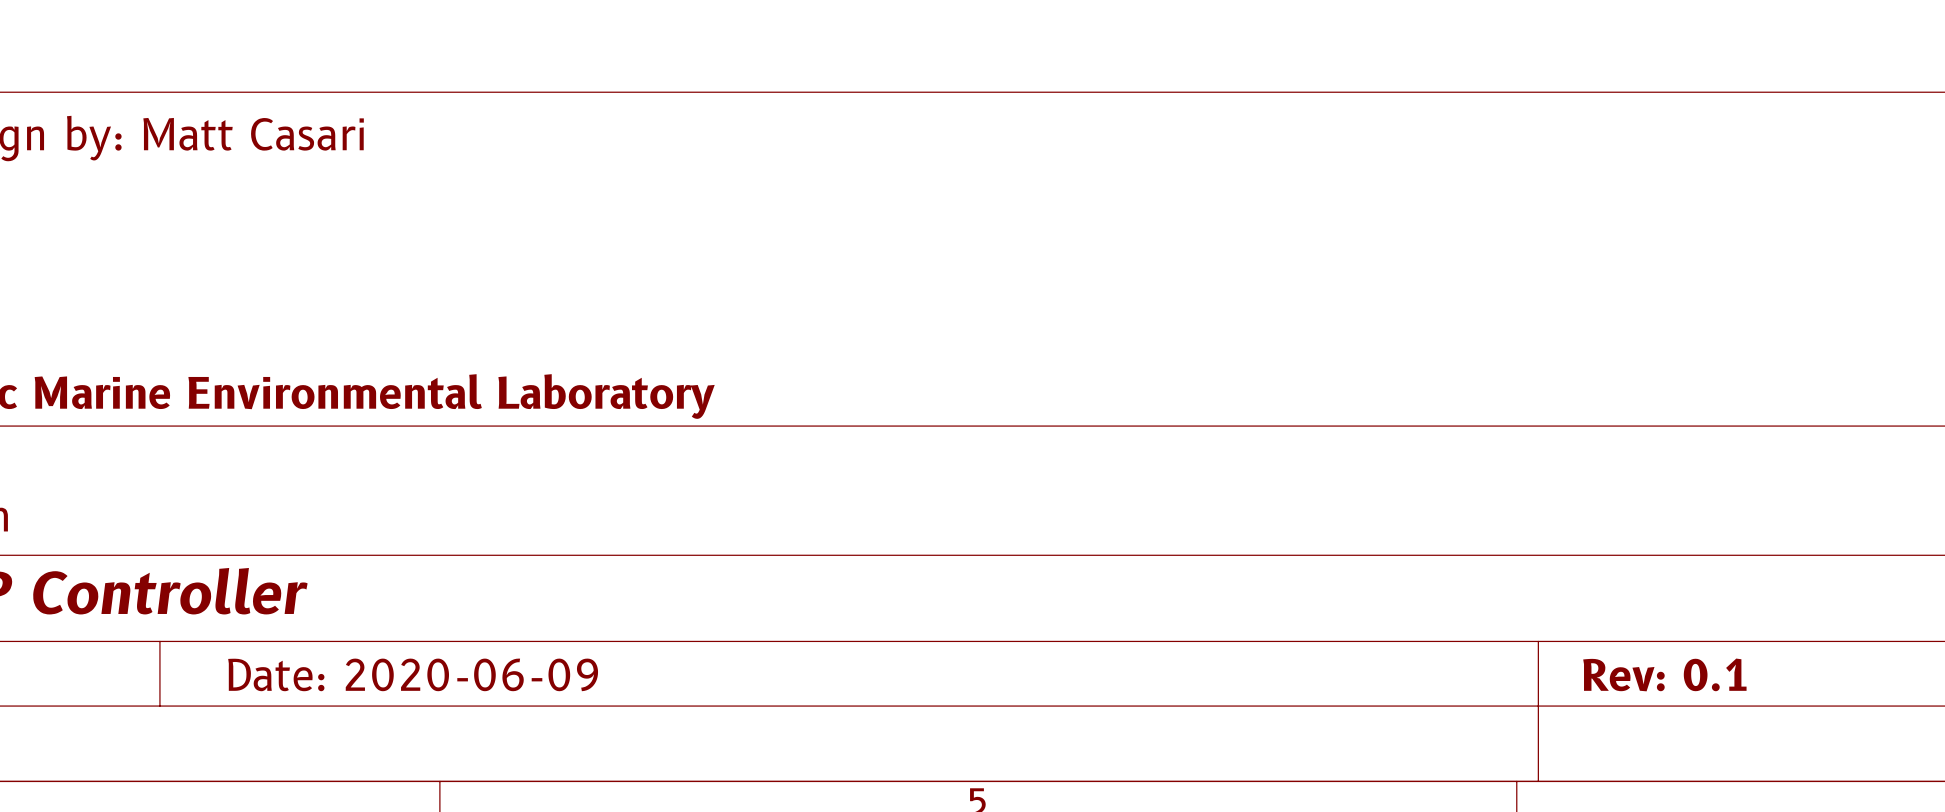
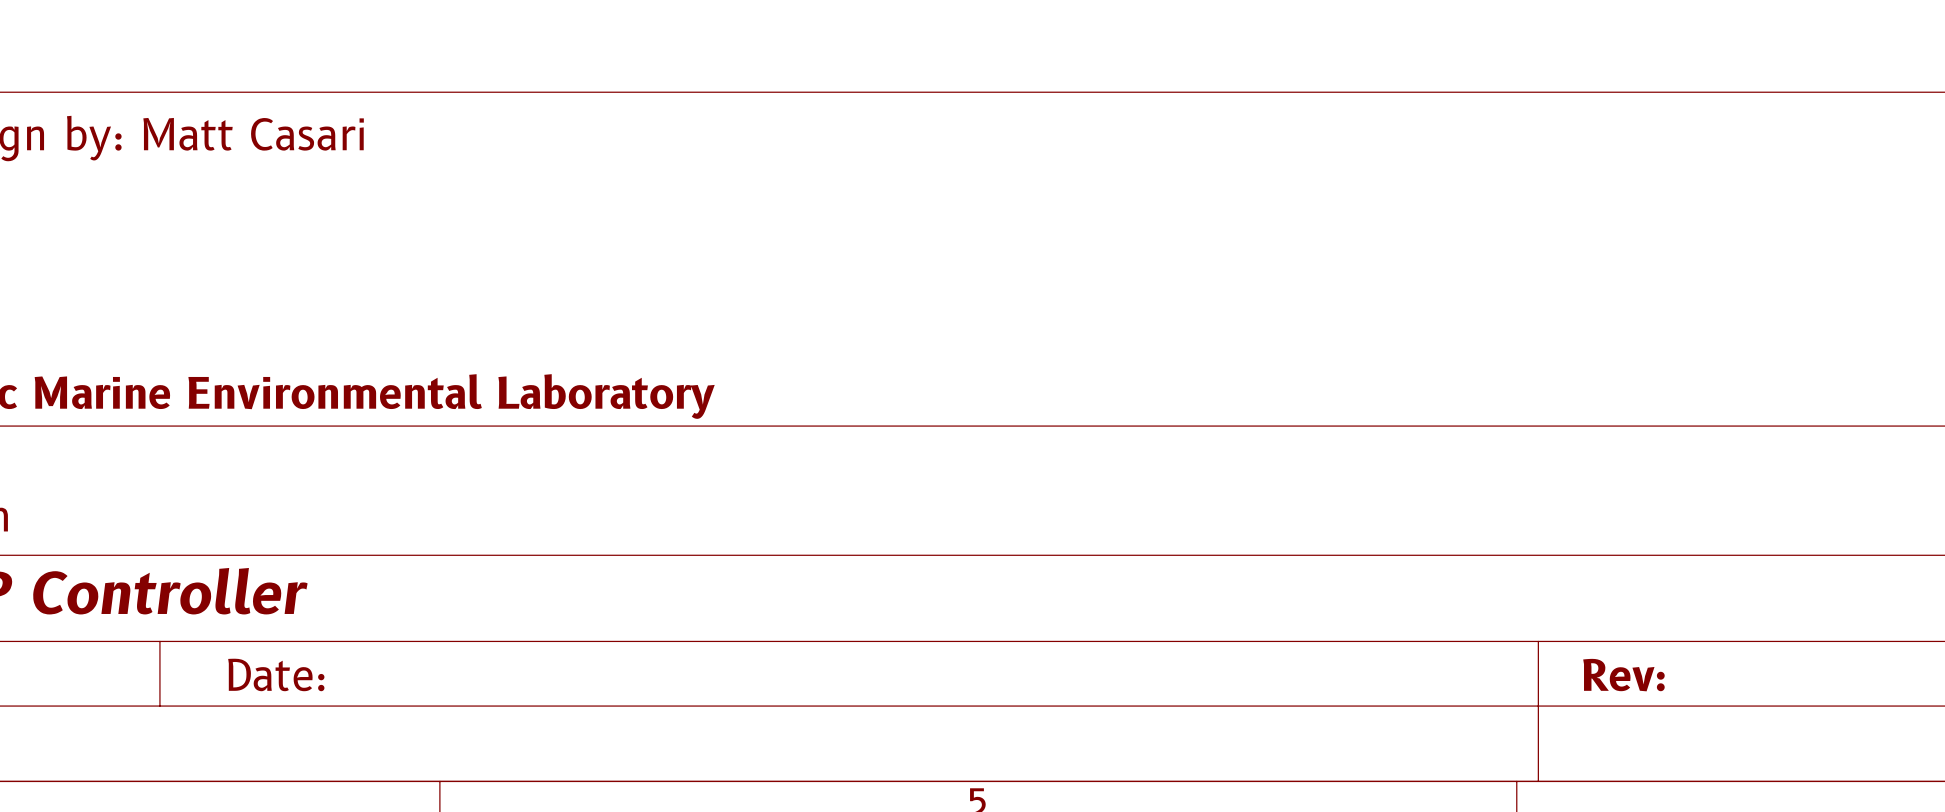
title block: Date: 2020-06-09 (413, 674) -> Date: (276, 674)
title block: Rev: 0.1 (1664, 674) -> Rev: (1623, 675)

